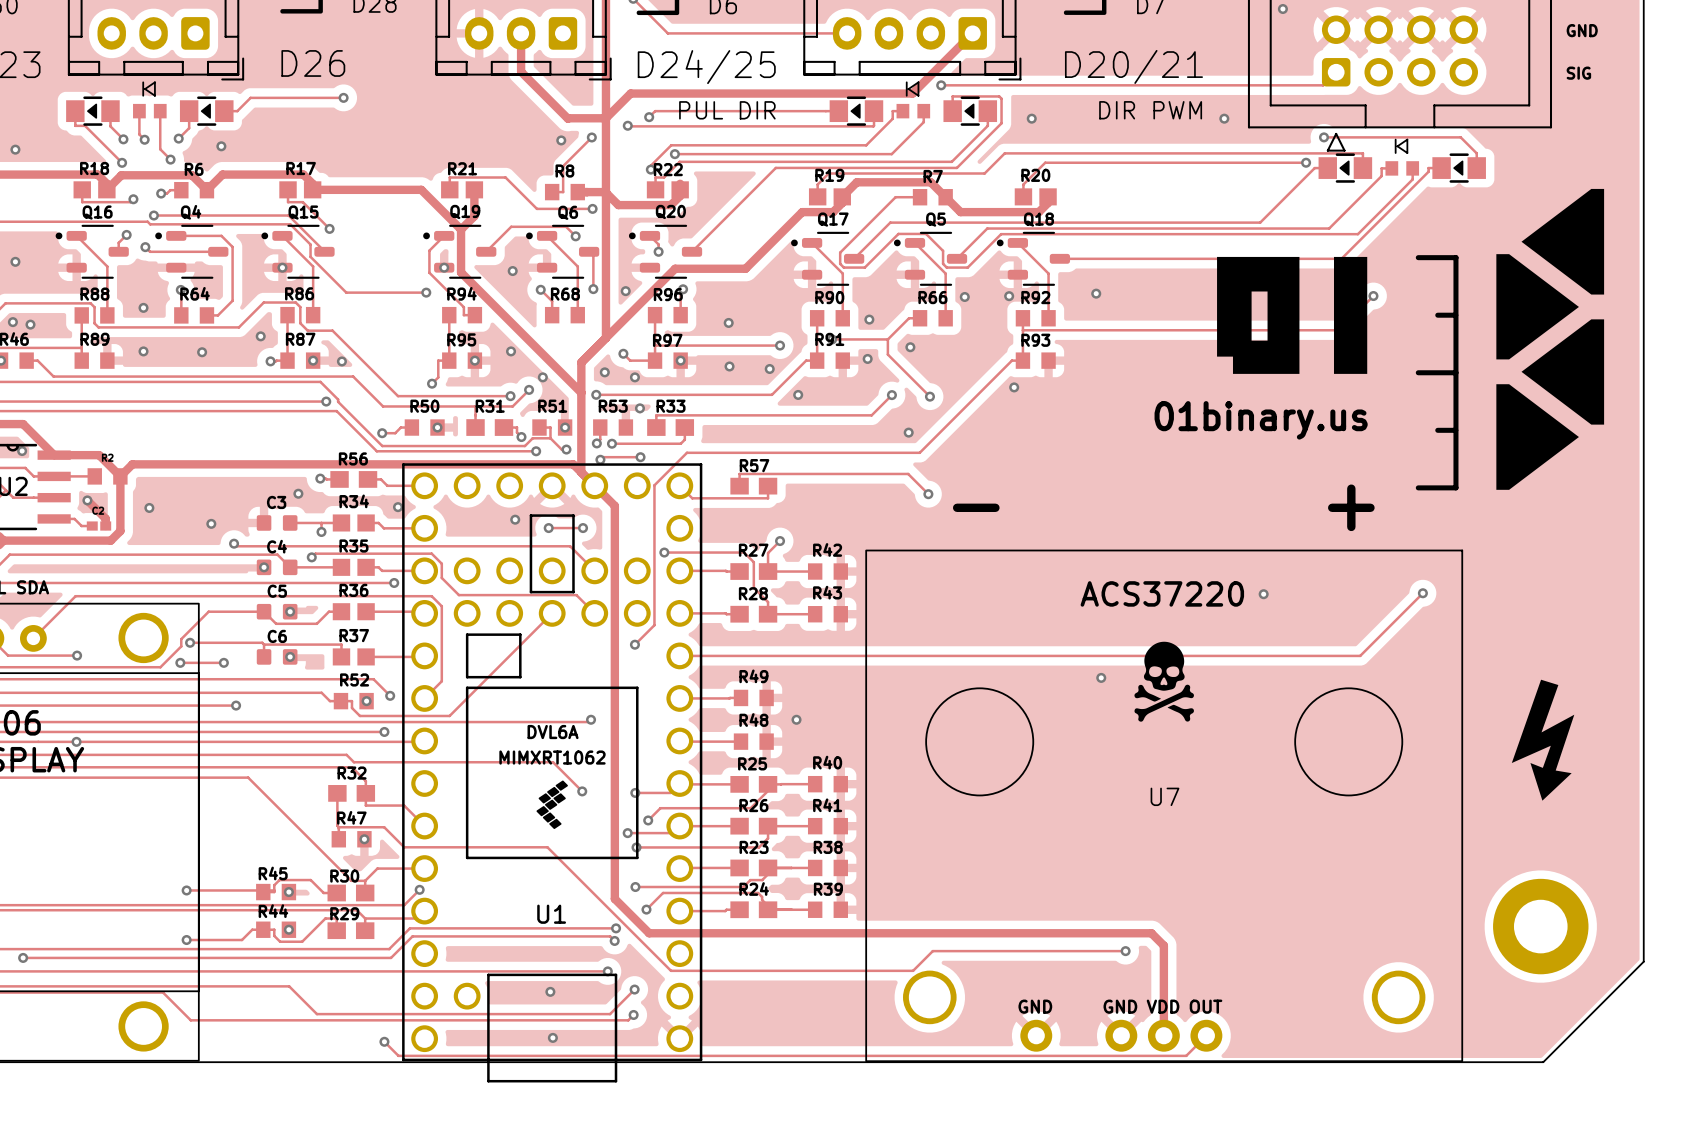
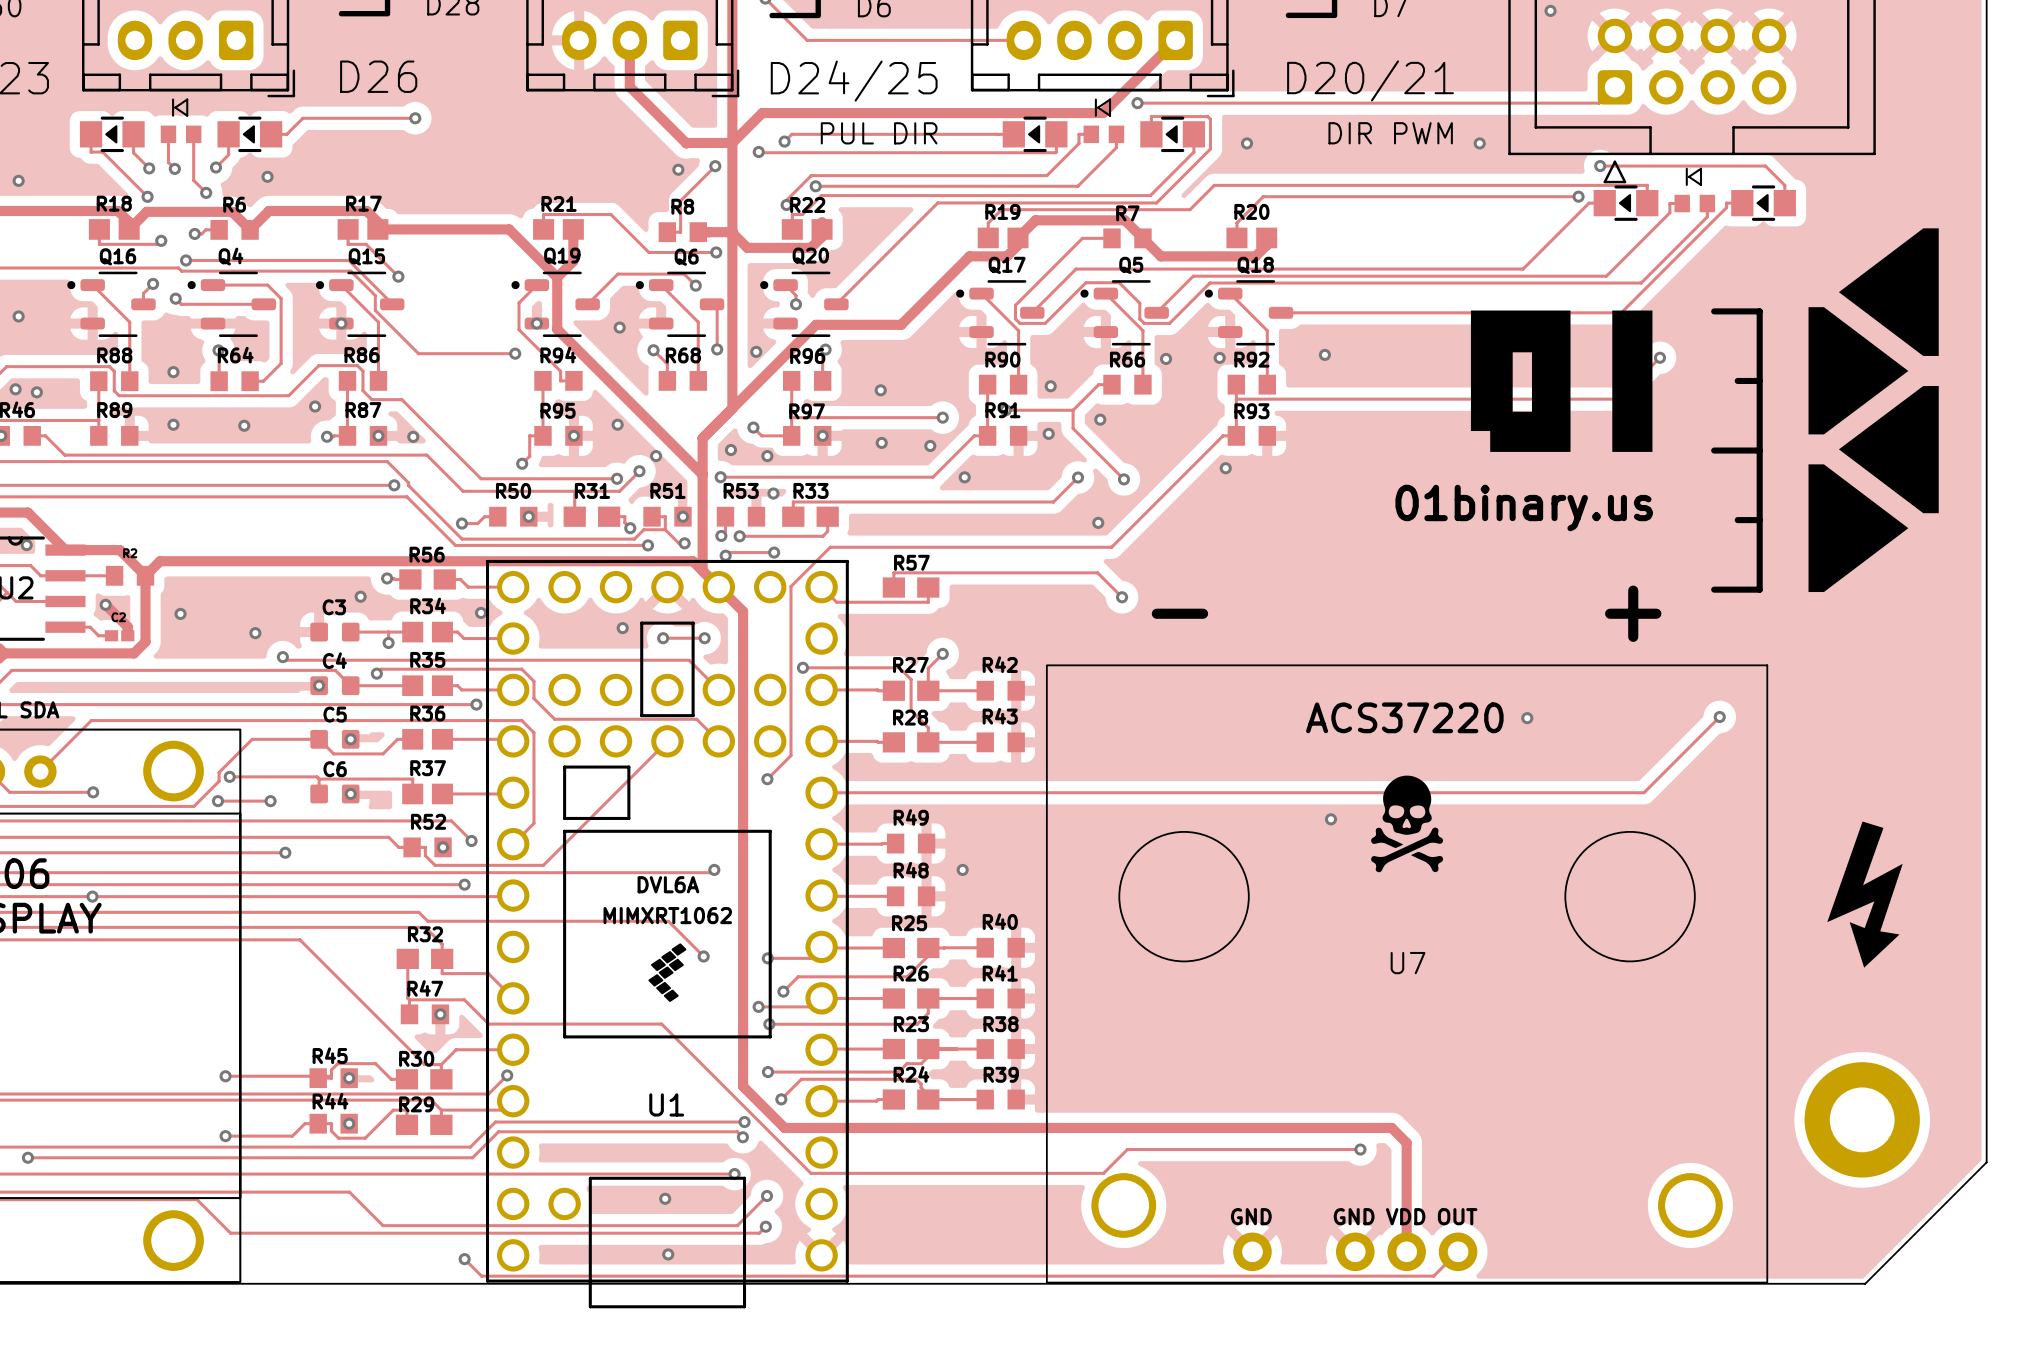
text: GND (1582, 30) -> none
text: SIG (1578, 73) -> none

